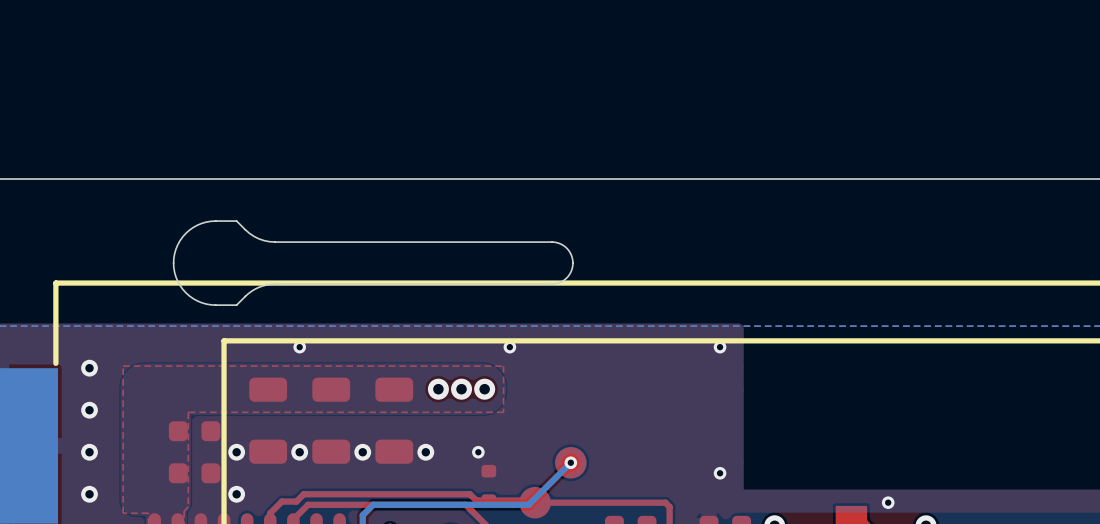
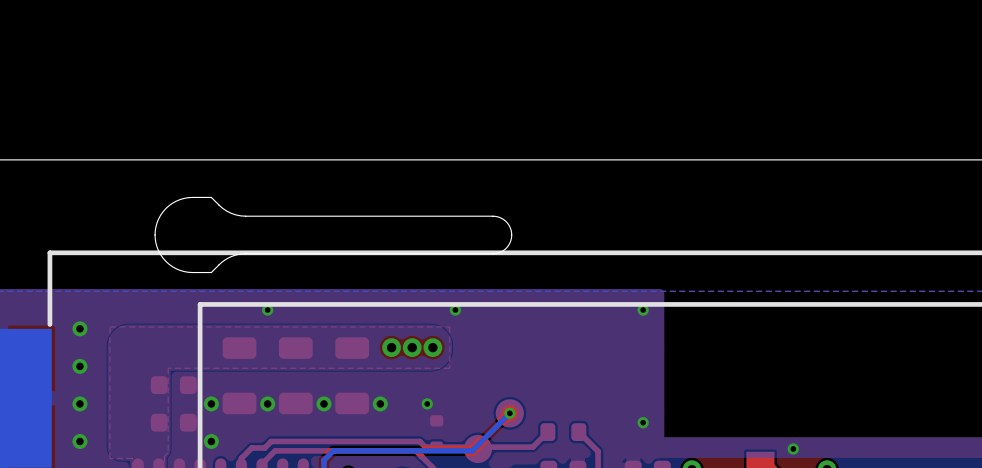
part: none -> (563, 432)
top track: none -> (578, 432) (598, 452)
top track: (533, 500) (535, 502) (665, 502) (669, 506) -> (476, 447) (532, 447) (547, 432)

